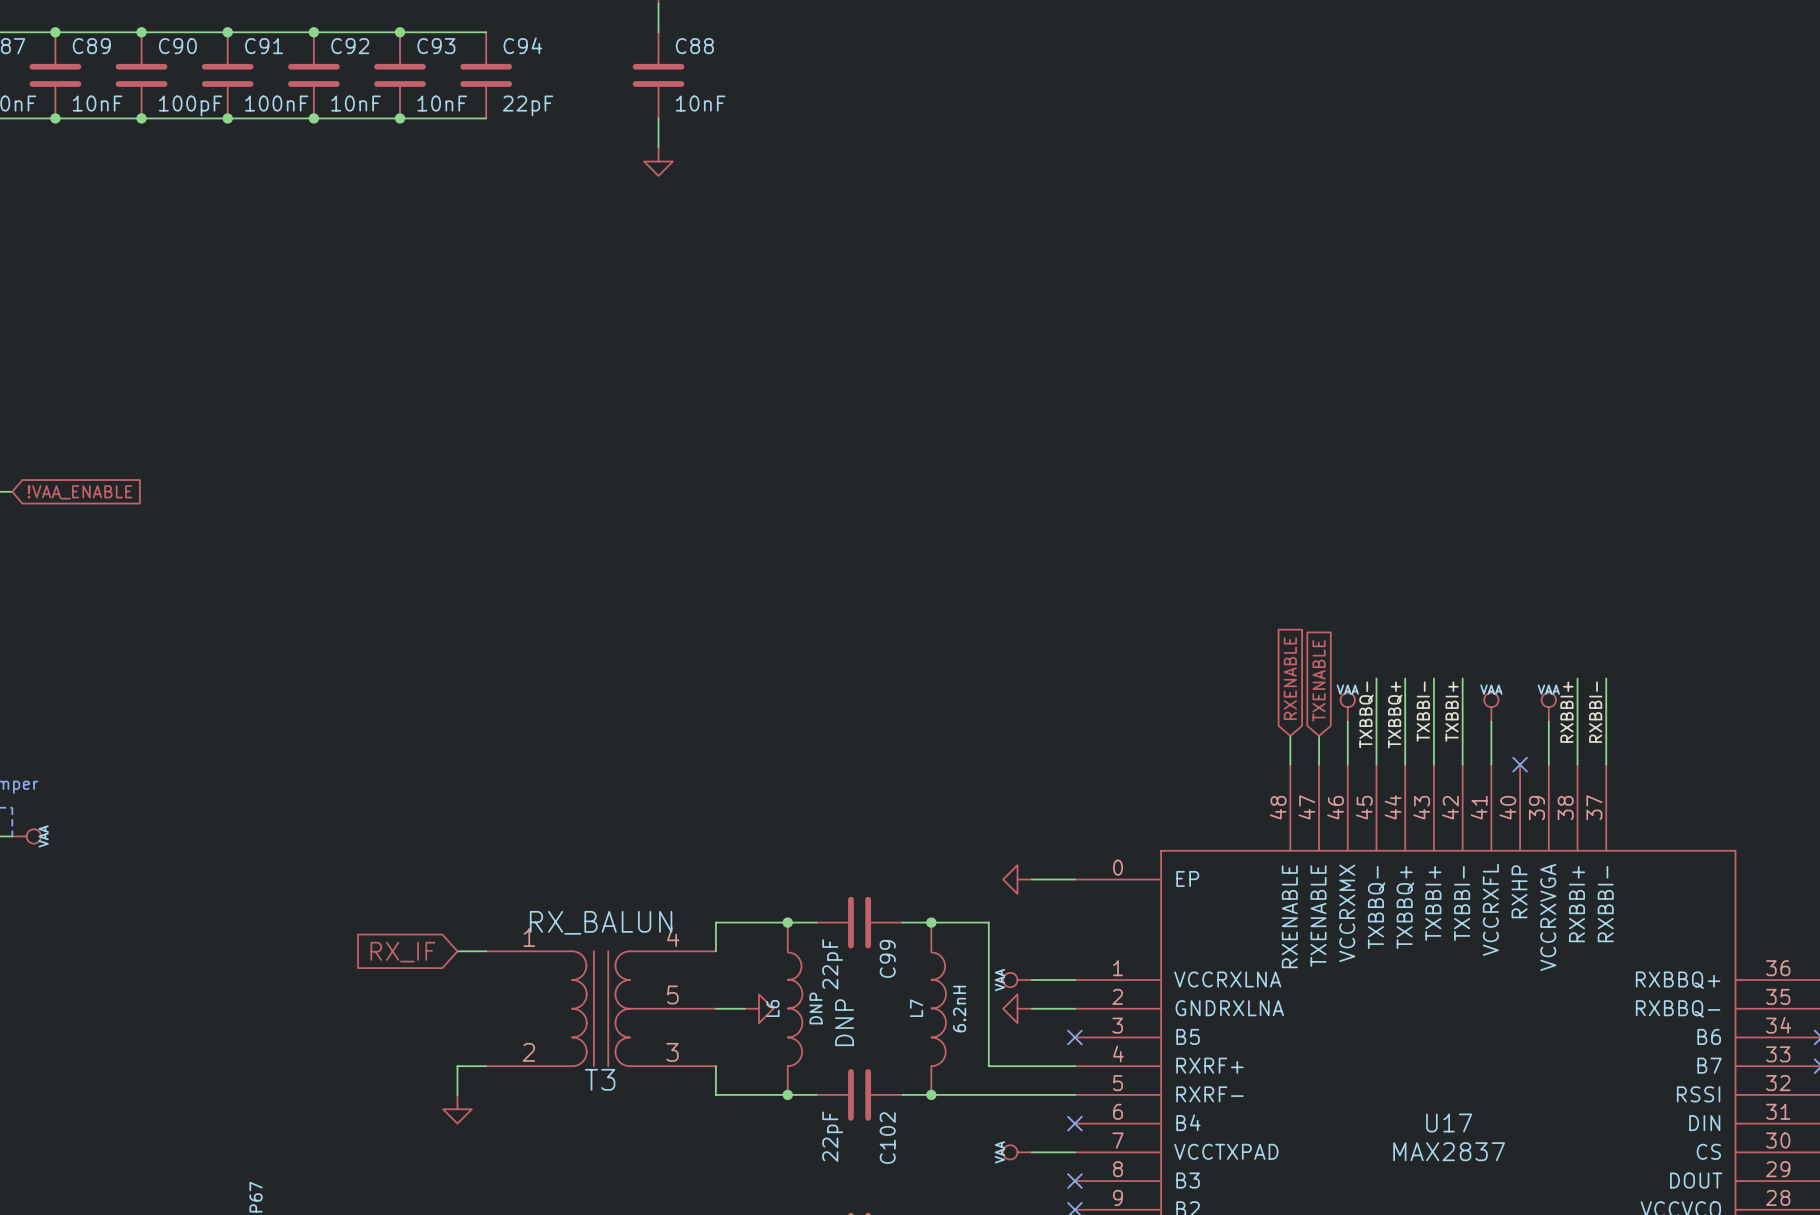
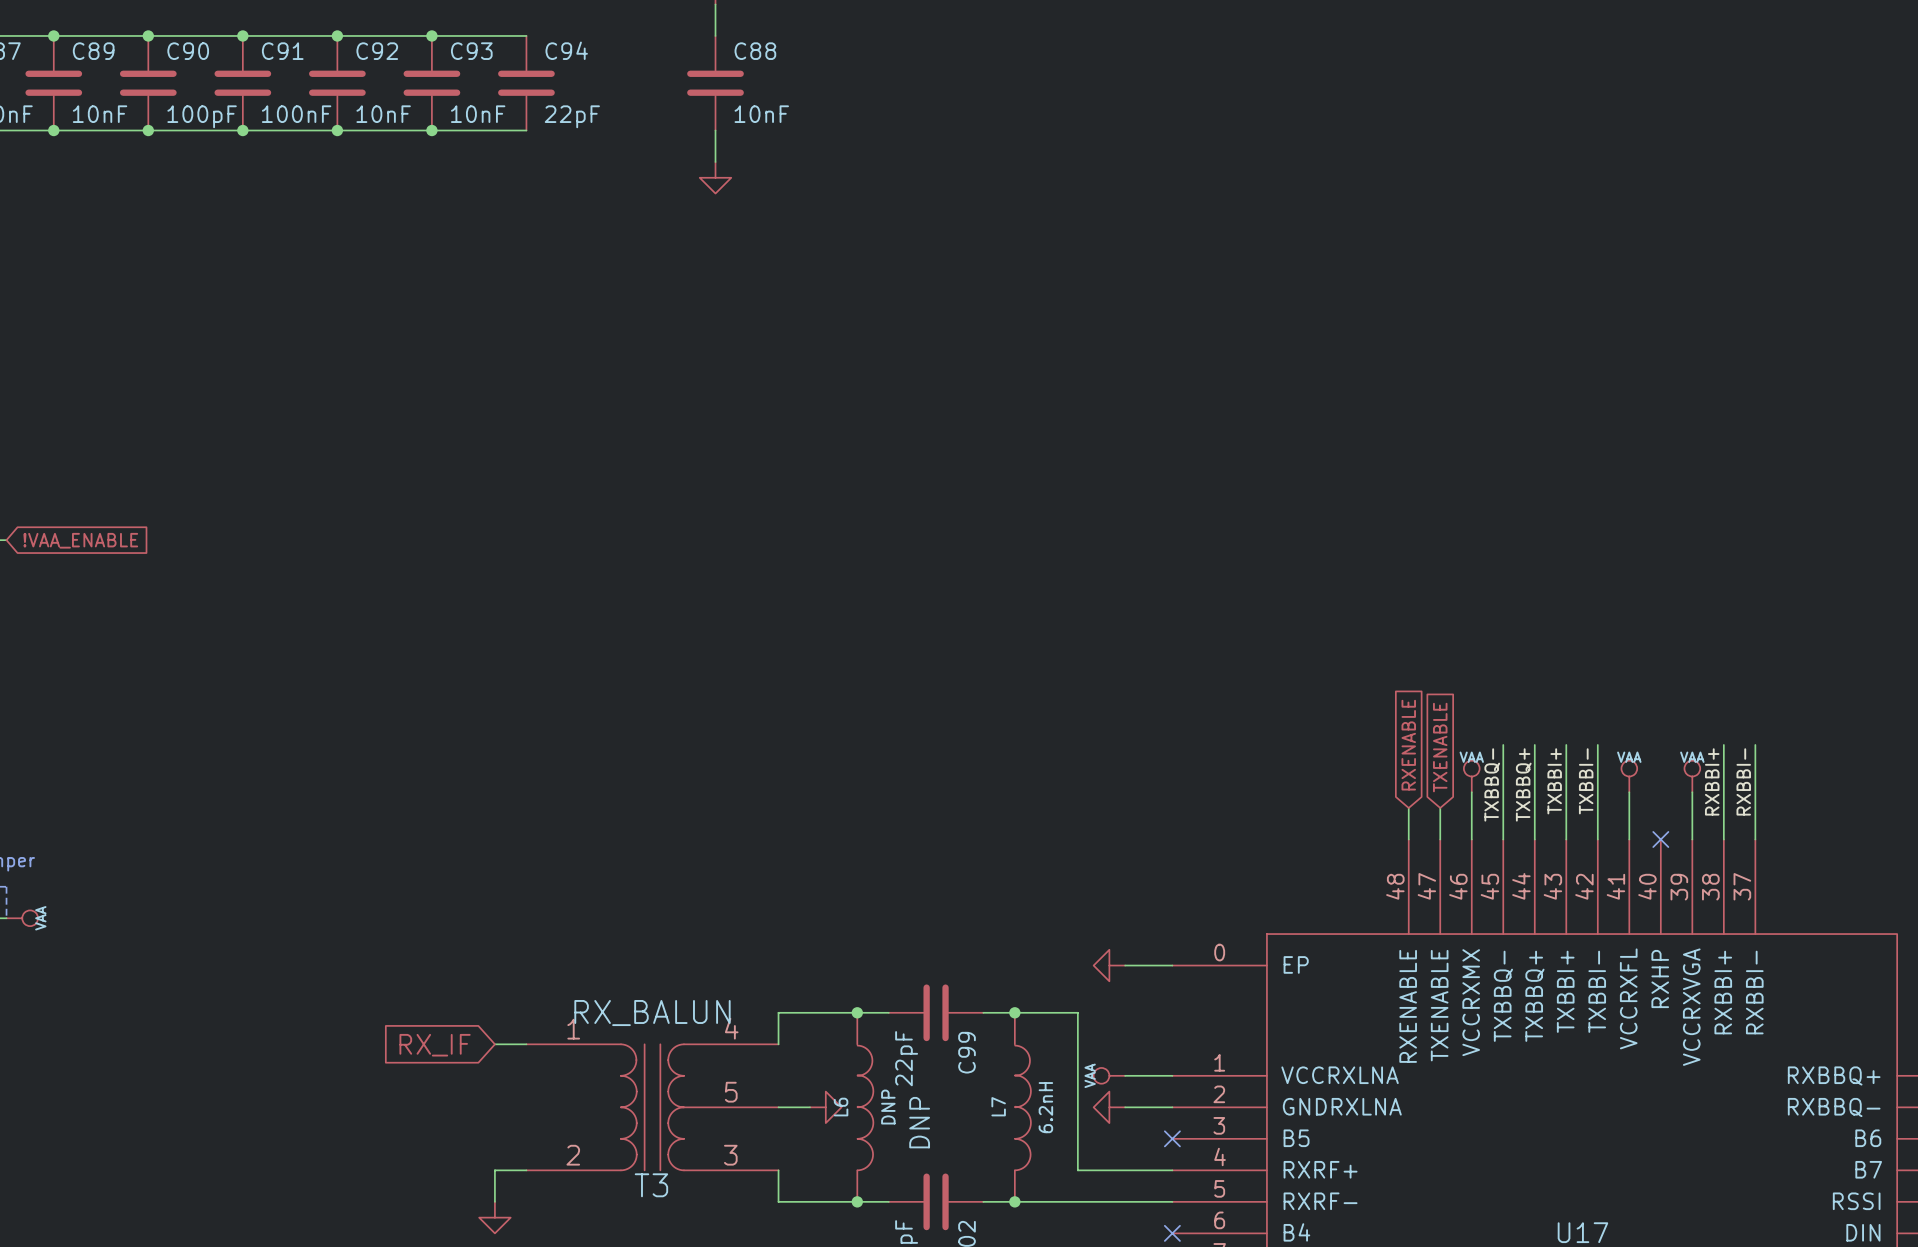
label: TXBBI- (1423, 711) -> TXBBI+ (1554, 781)
label: TXBBI+ (1452, 711) -> TXBBI- (1586, 781)

